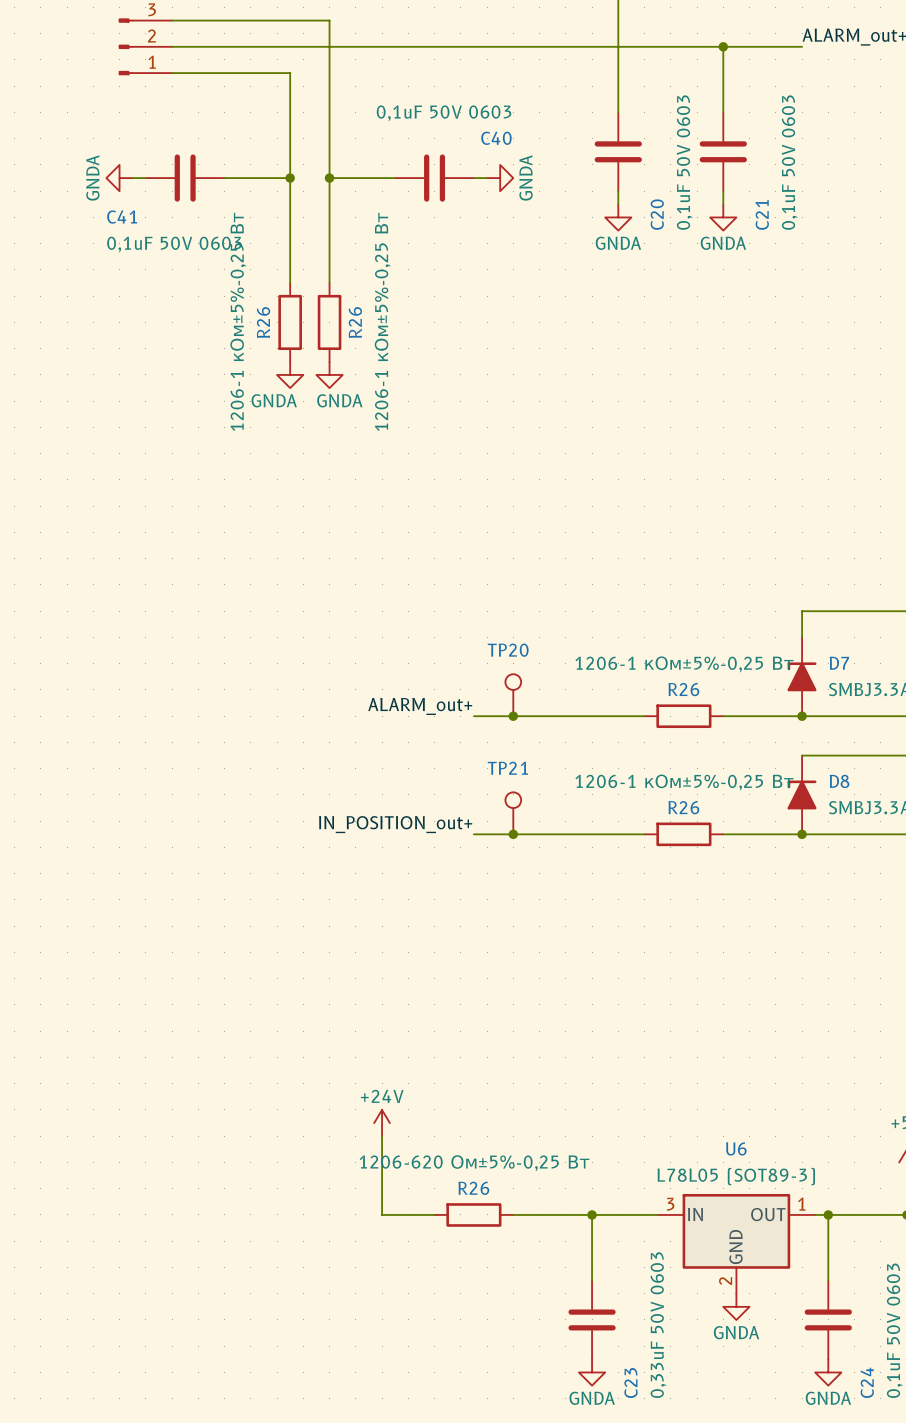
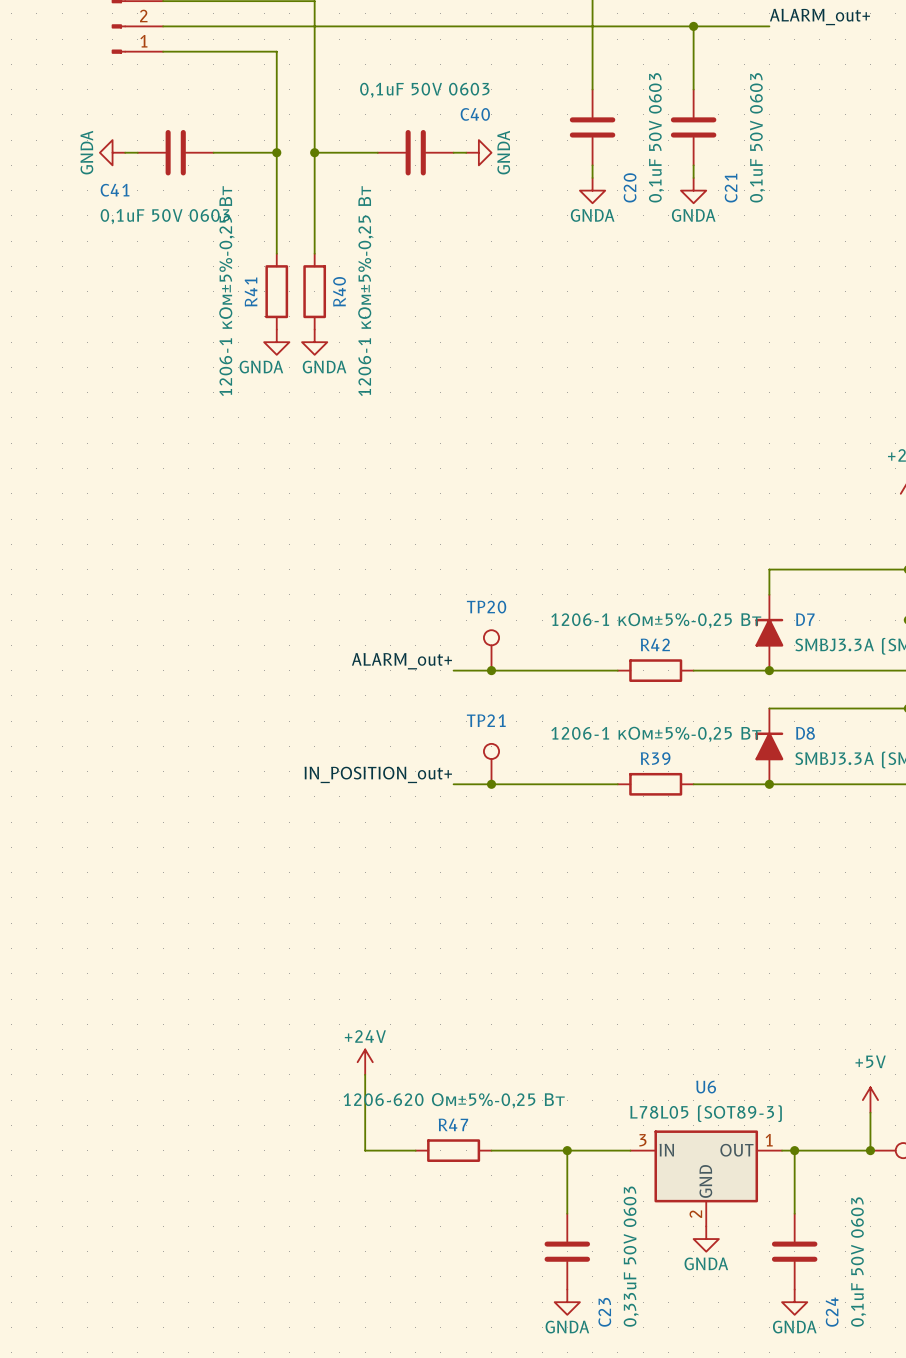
R26 name: R26 (263, 322) -> R41 (251, 292)
R26 name: R26 (355, 322) -> R40 (339, 291)
R26 name: R26 (683, 689) -> R42 (655, 644)
R26 name: R26 (683, 807) -> R39 (655, 758)
R26 name: R26 (473, 1188) -> R47 (453, 1124)

